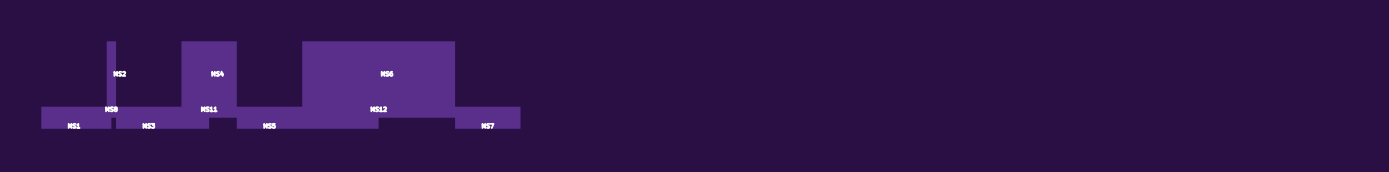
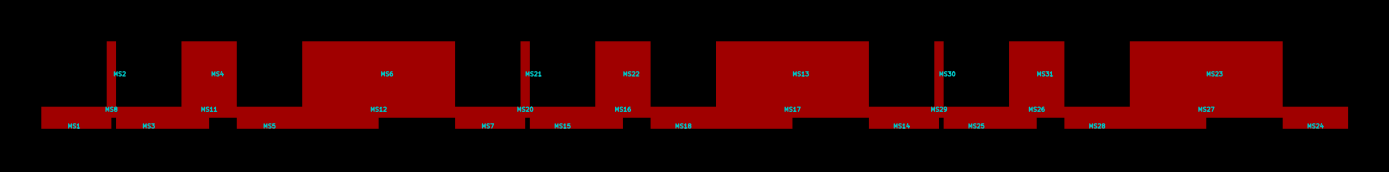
part: none -> (525, 74)
part: none -> (622, 74)
part: none -> (792, 74)
part: none -> (938, 74)
part: none -> (1036, 74)
part: none -> (1206, 74)
part: none -> (525, 117)
part: none -> (562, 117)
part: none -> (622, 117)
part: none -> (683, 117)
part: none -> (792, 117)
part: none -> (901, 117)
part: none -> (938, 117)
part: none -> (976, 117)
part: none -> (1036, 117)
part: none -> (1097, 117)
part: none -> (1206, 117)
part: none -> (1315, 117)

